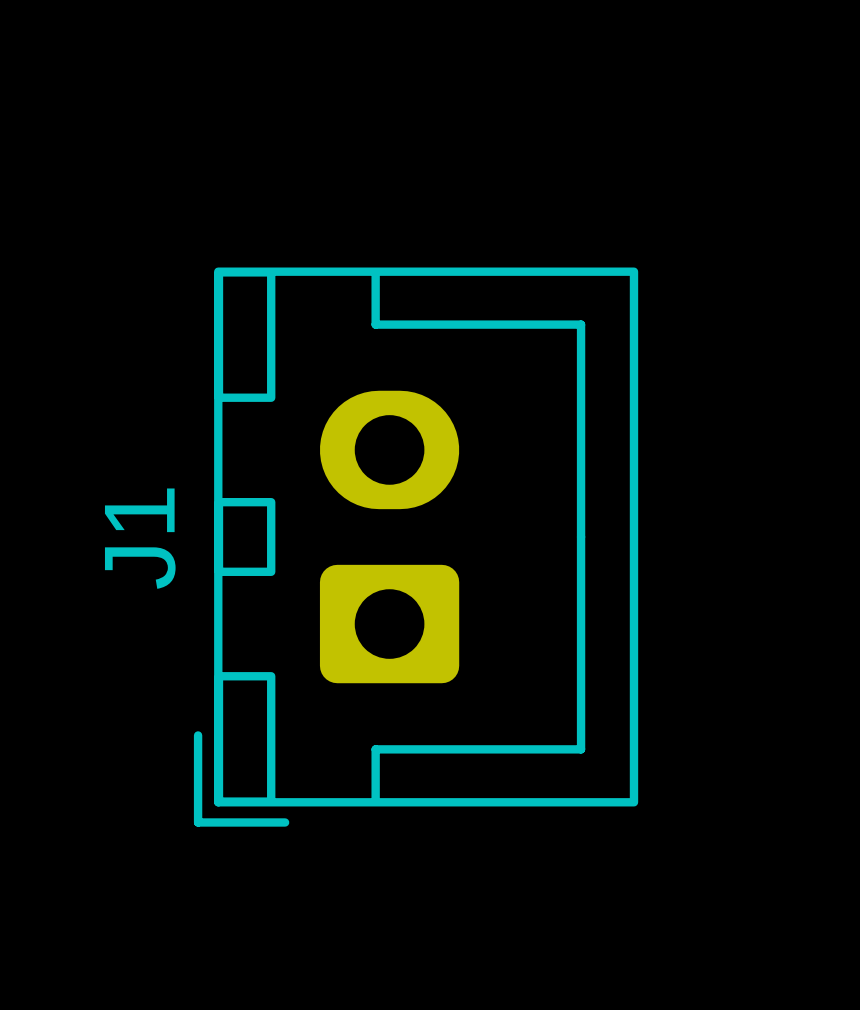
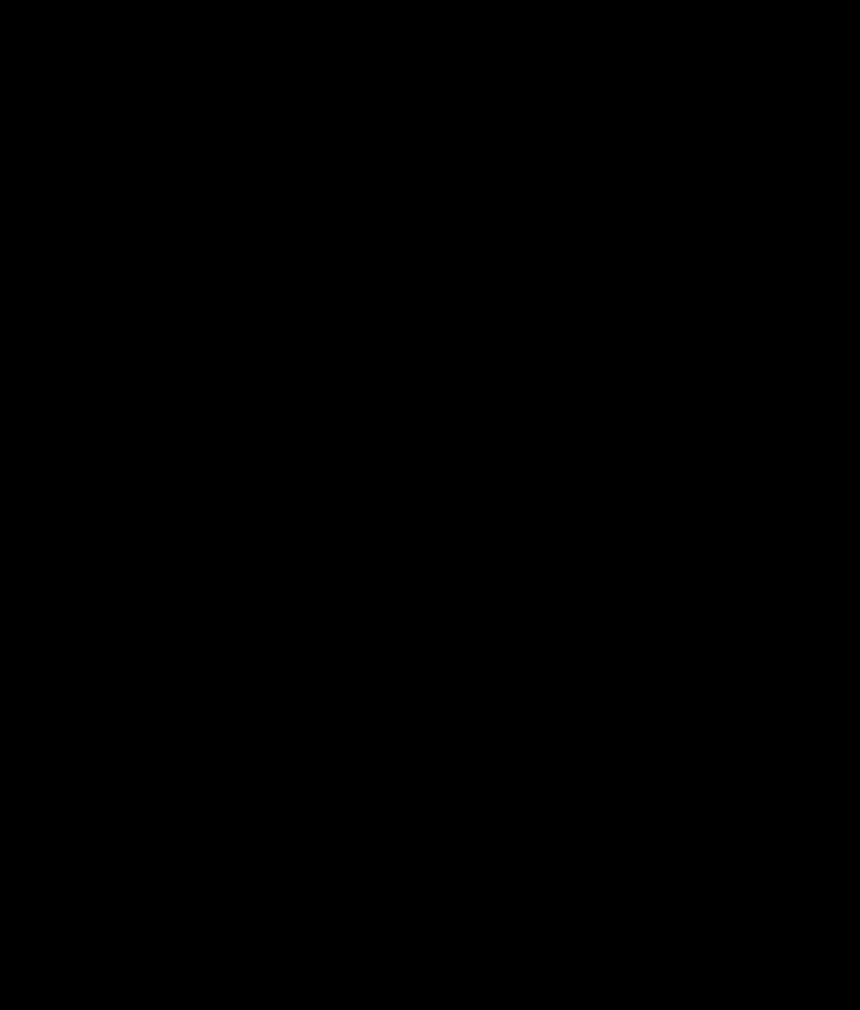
J1: (416, 547) -> none

